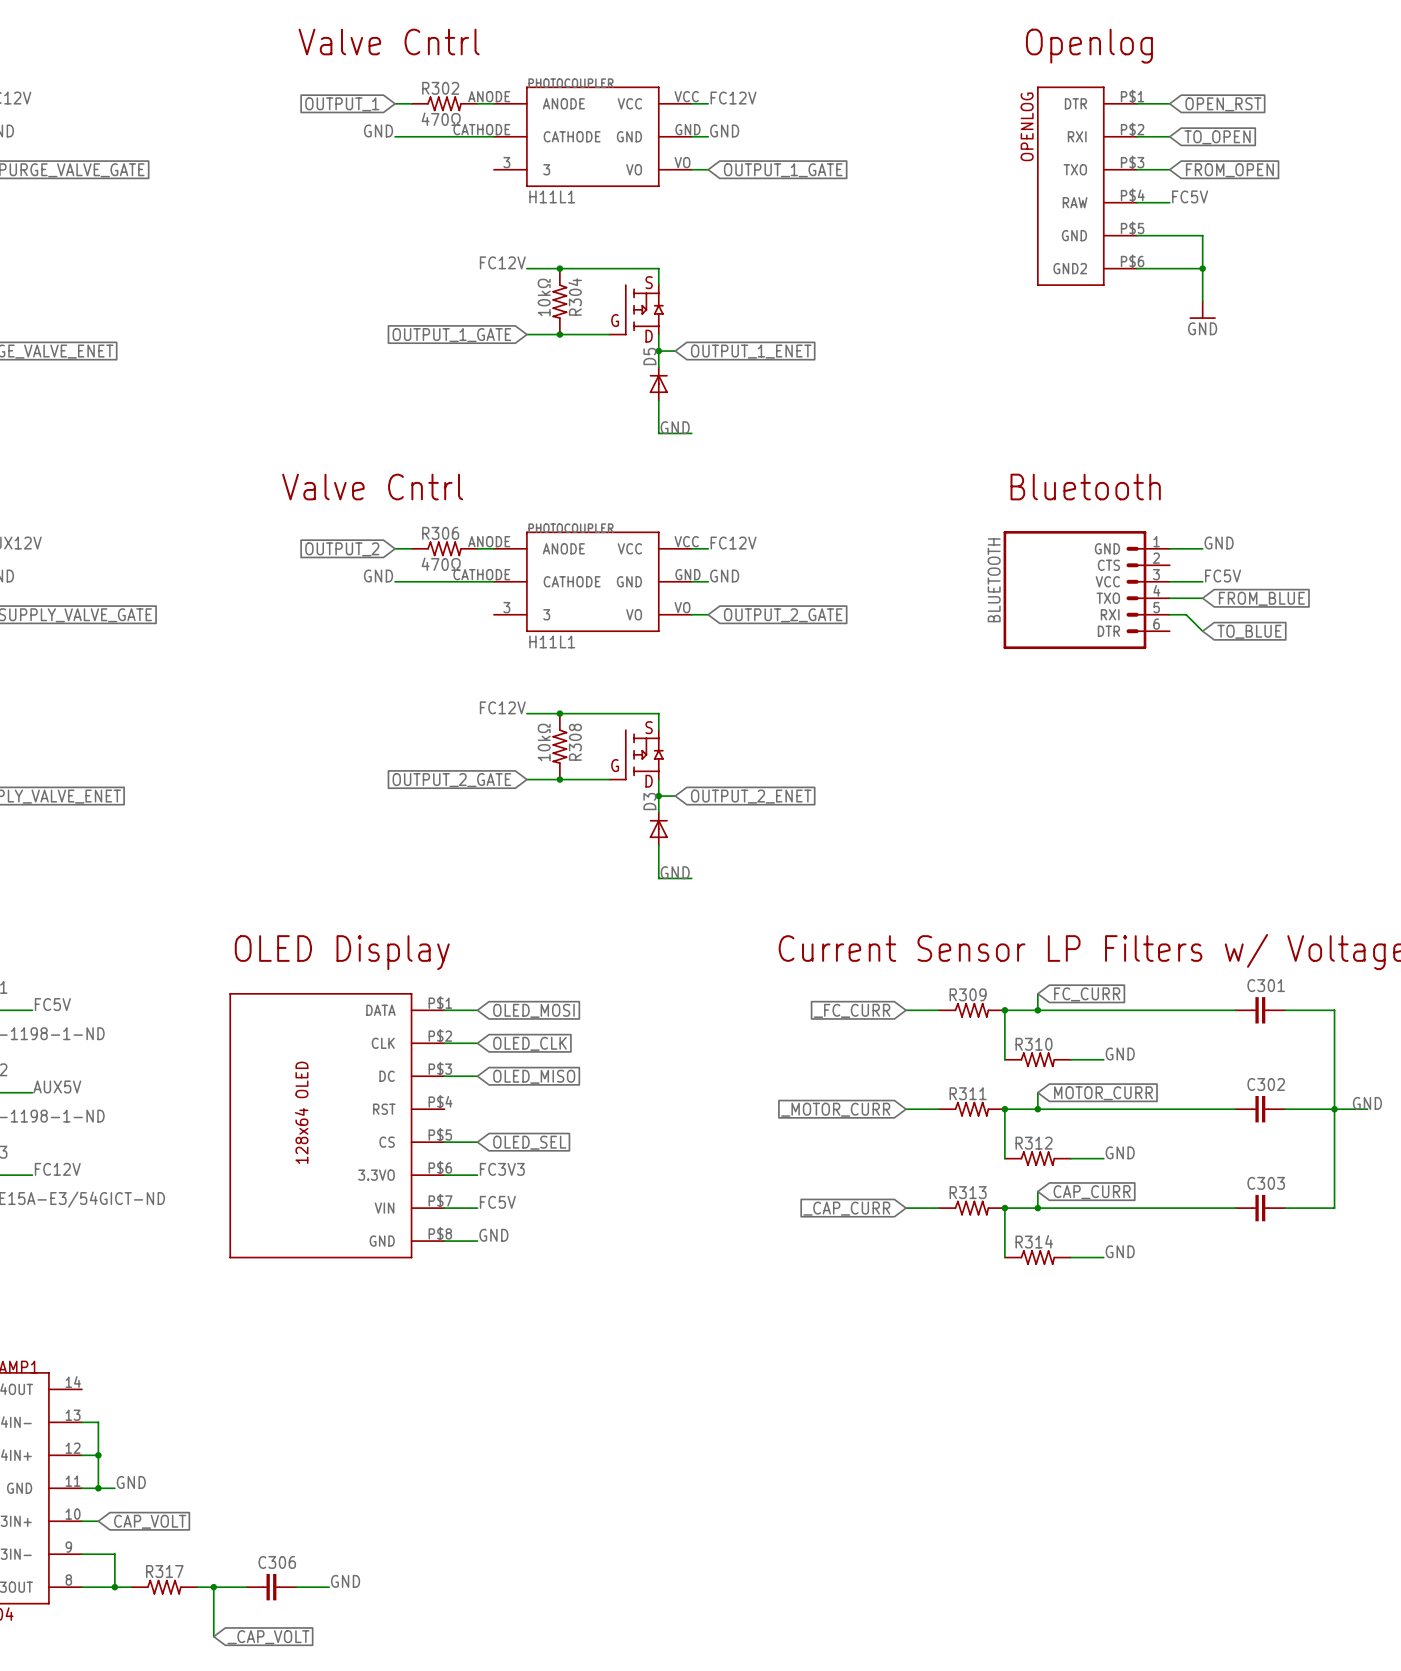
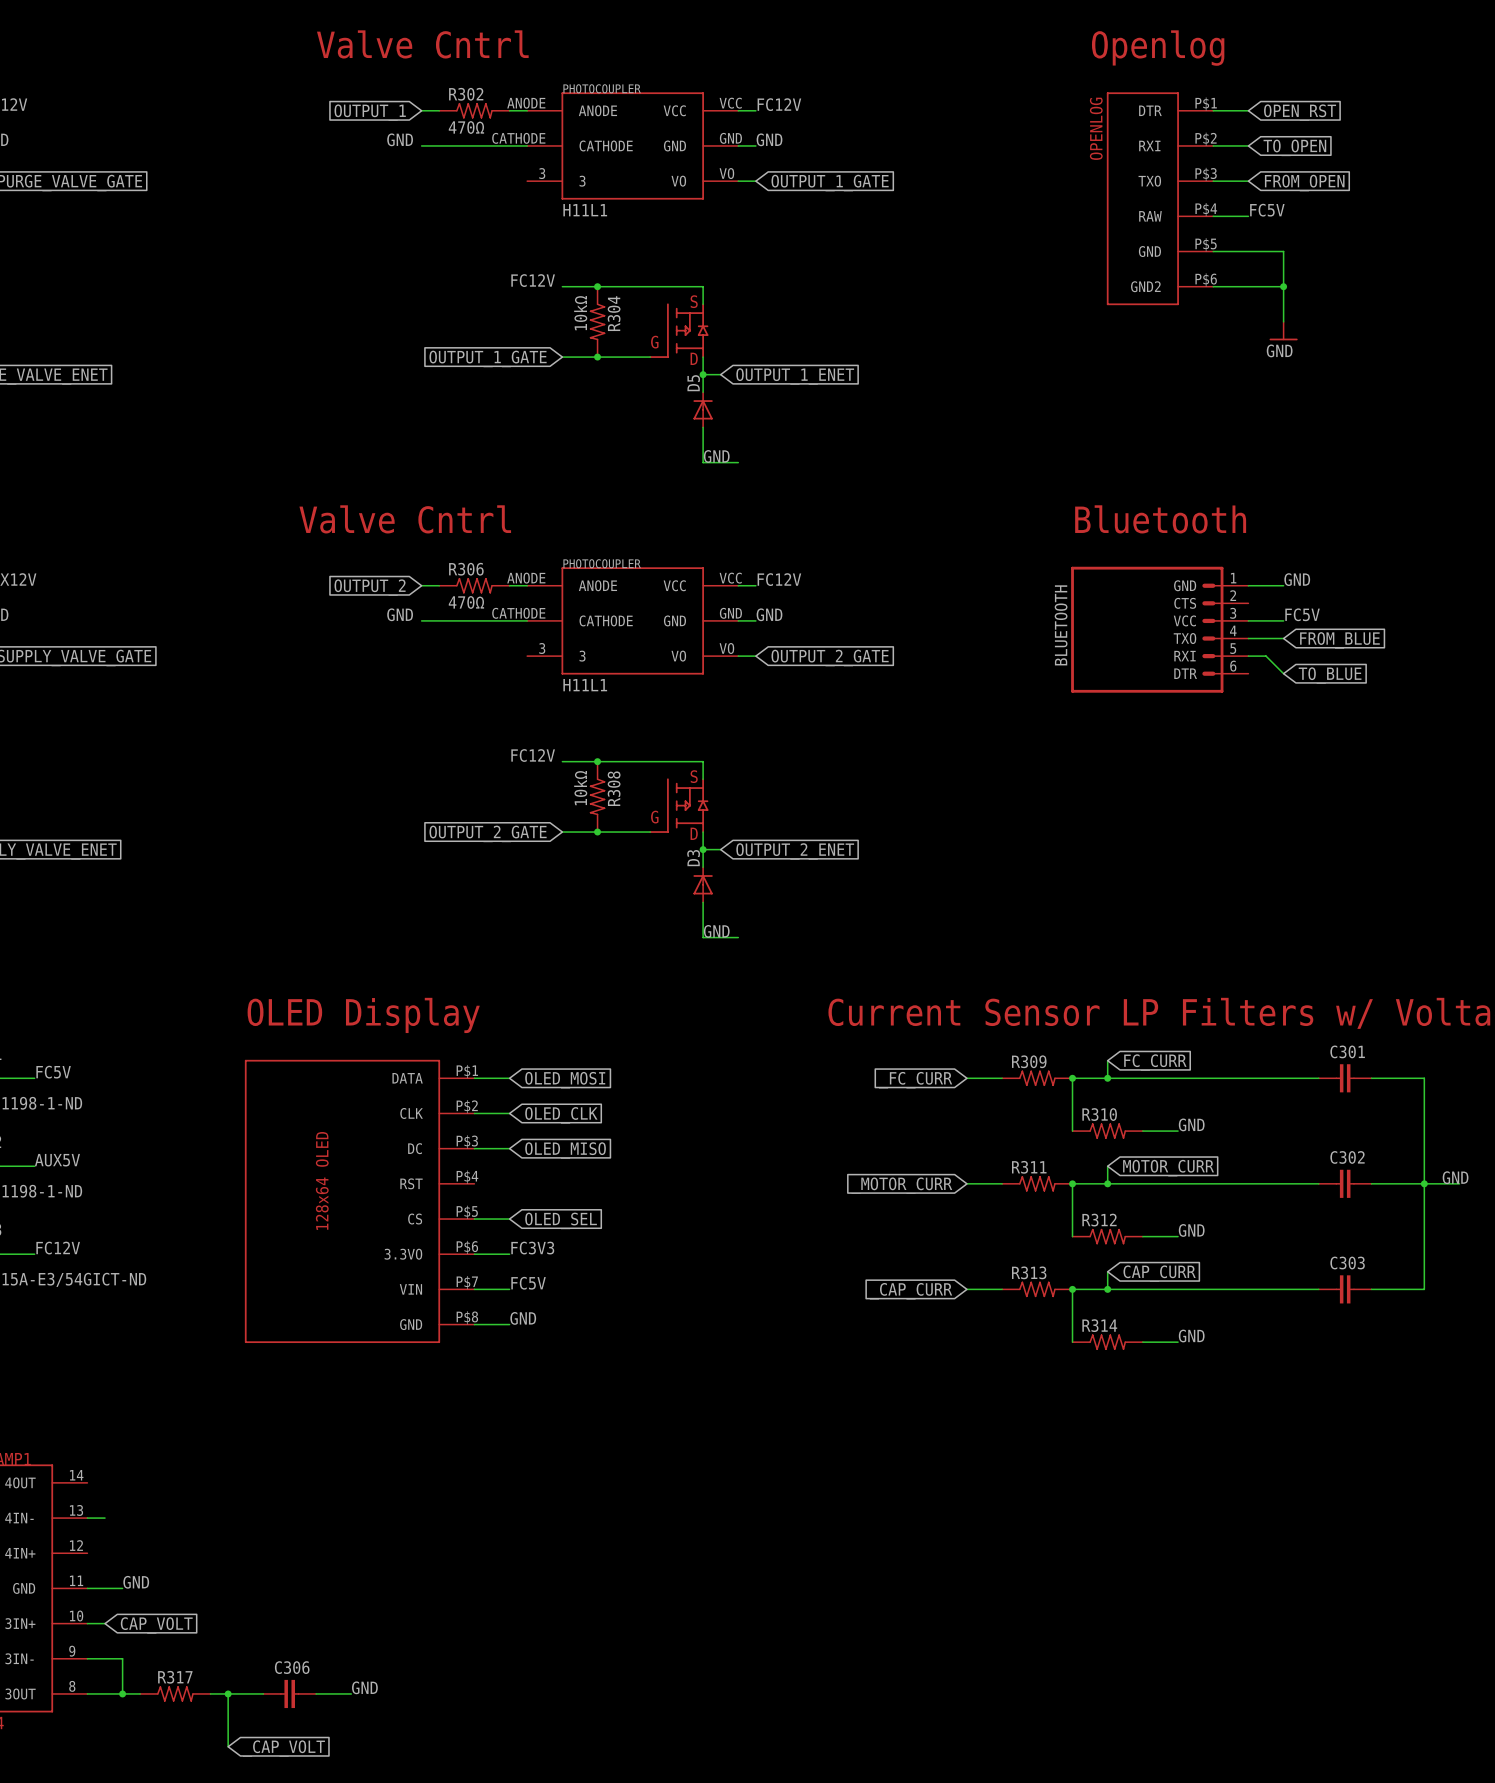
wire: (98, 1422) (98, 1488) -> none
wire: (81, 1455) (98, 1455) -> none
junction: (98, 1455) -> none
junction: (98, 1488) -> none

